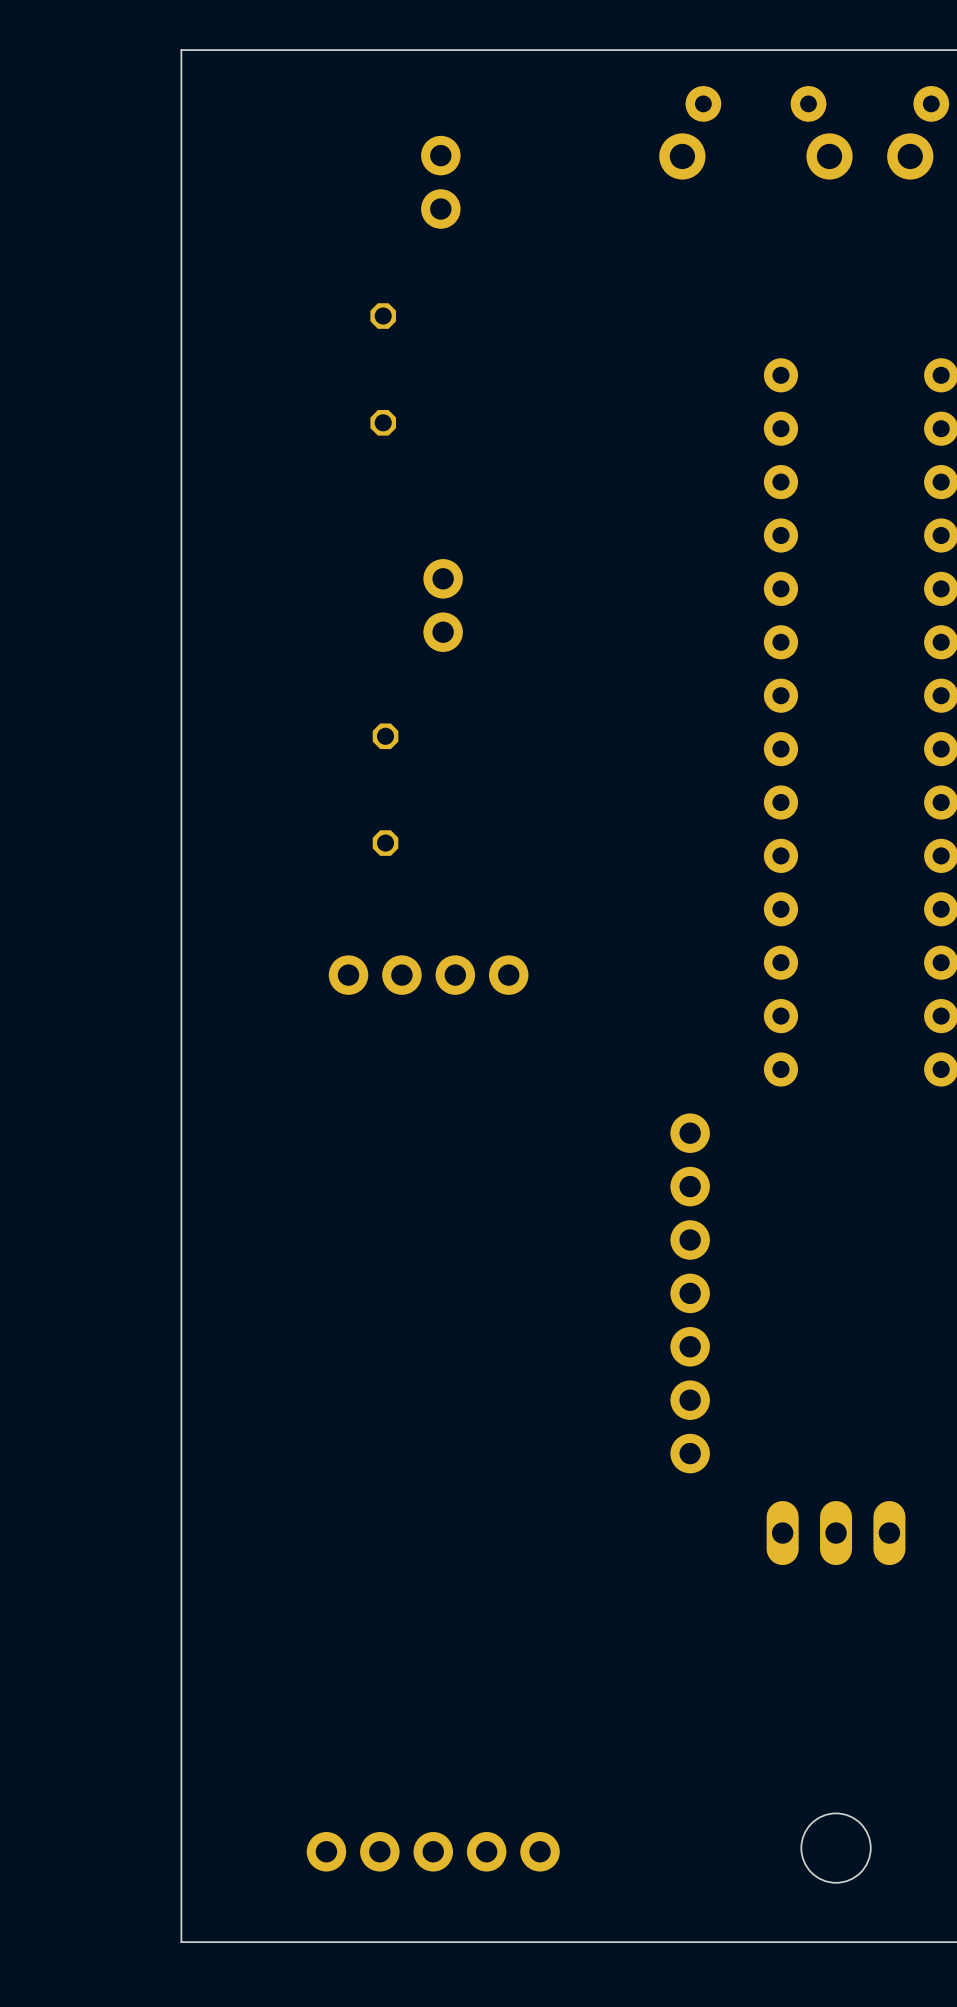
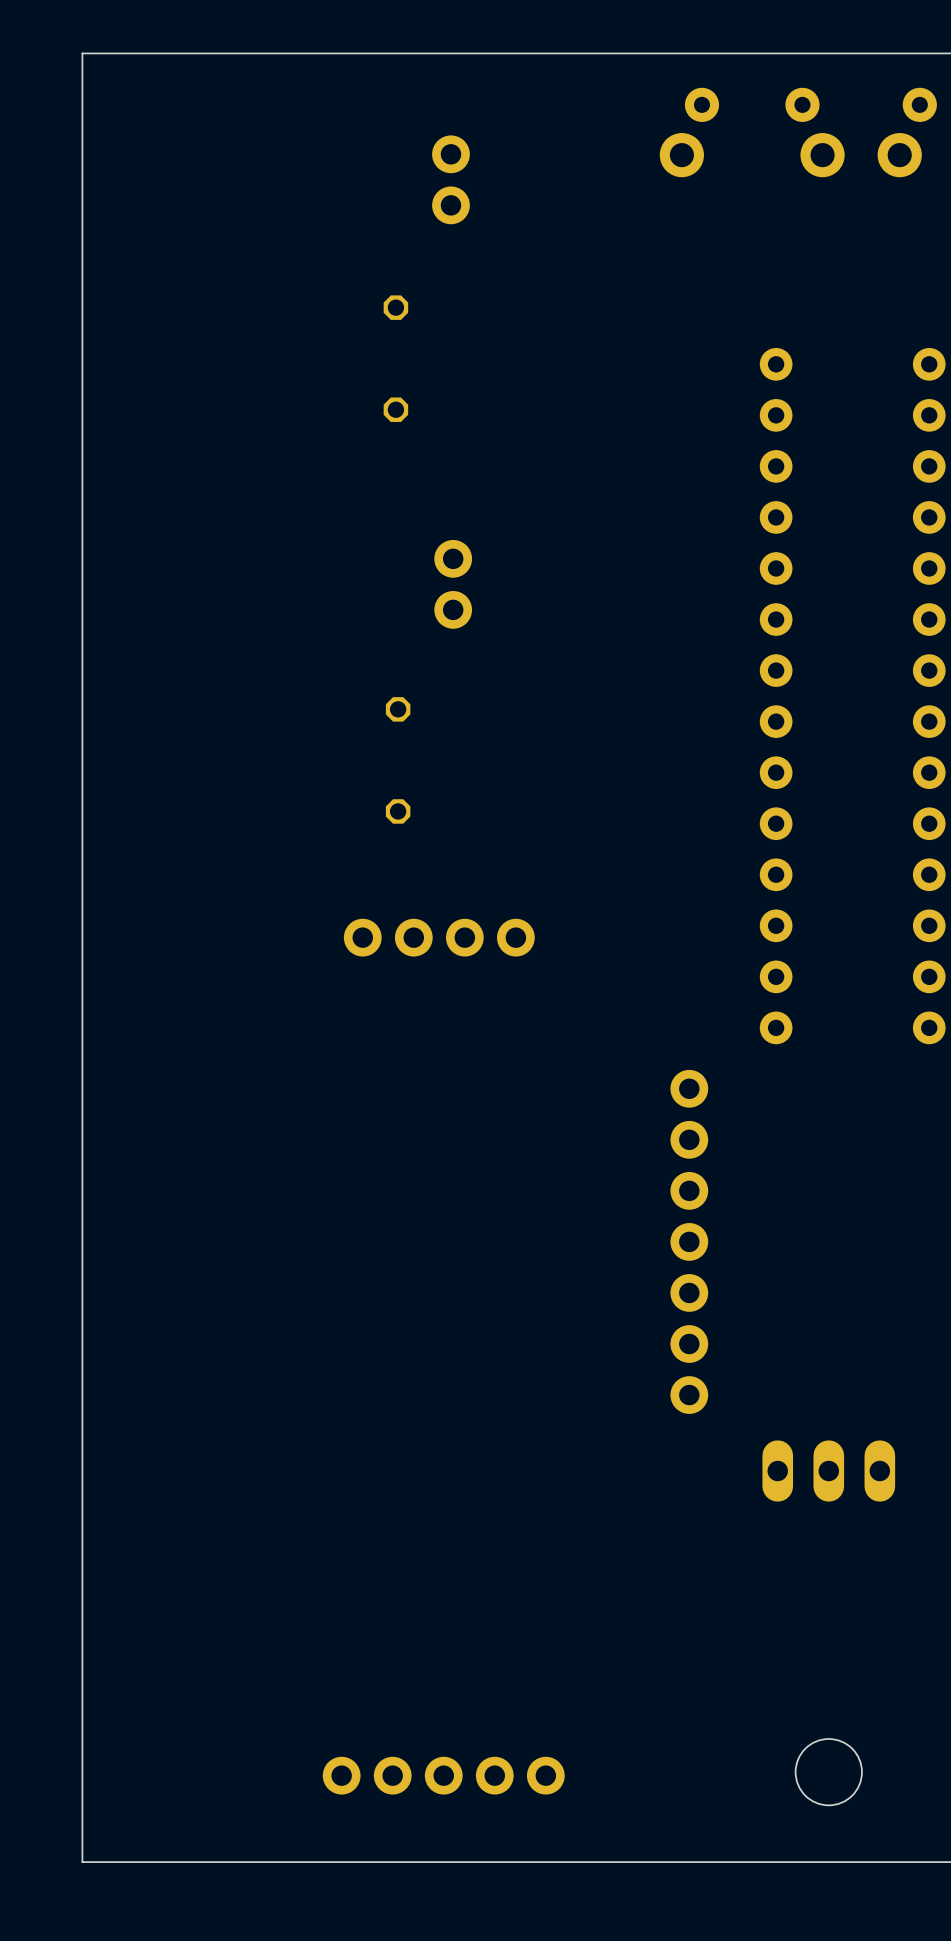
board edge: (181, 50) (181, 1942) -> (203, 53) (82, 53) (82, 1862) (203, 1862)

